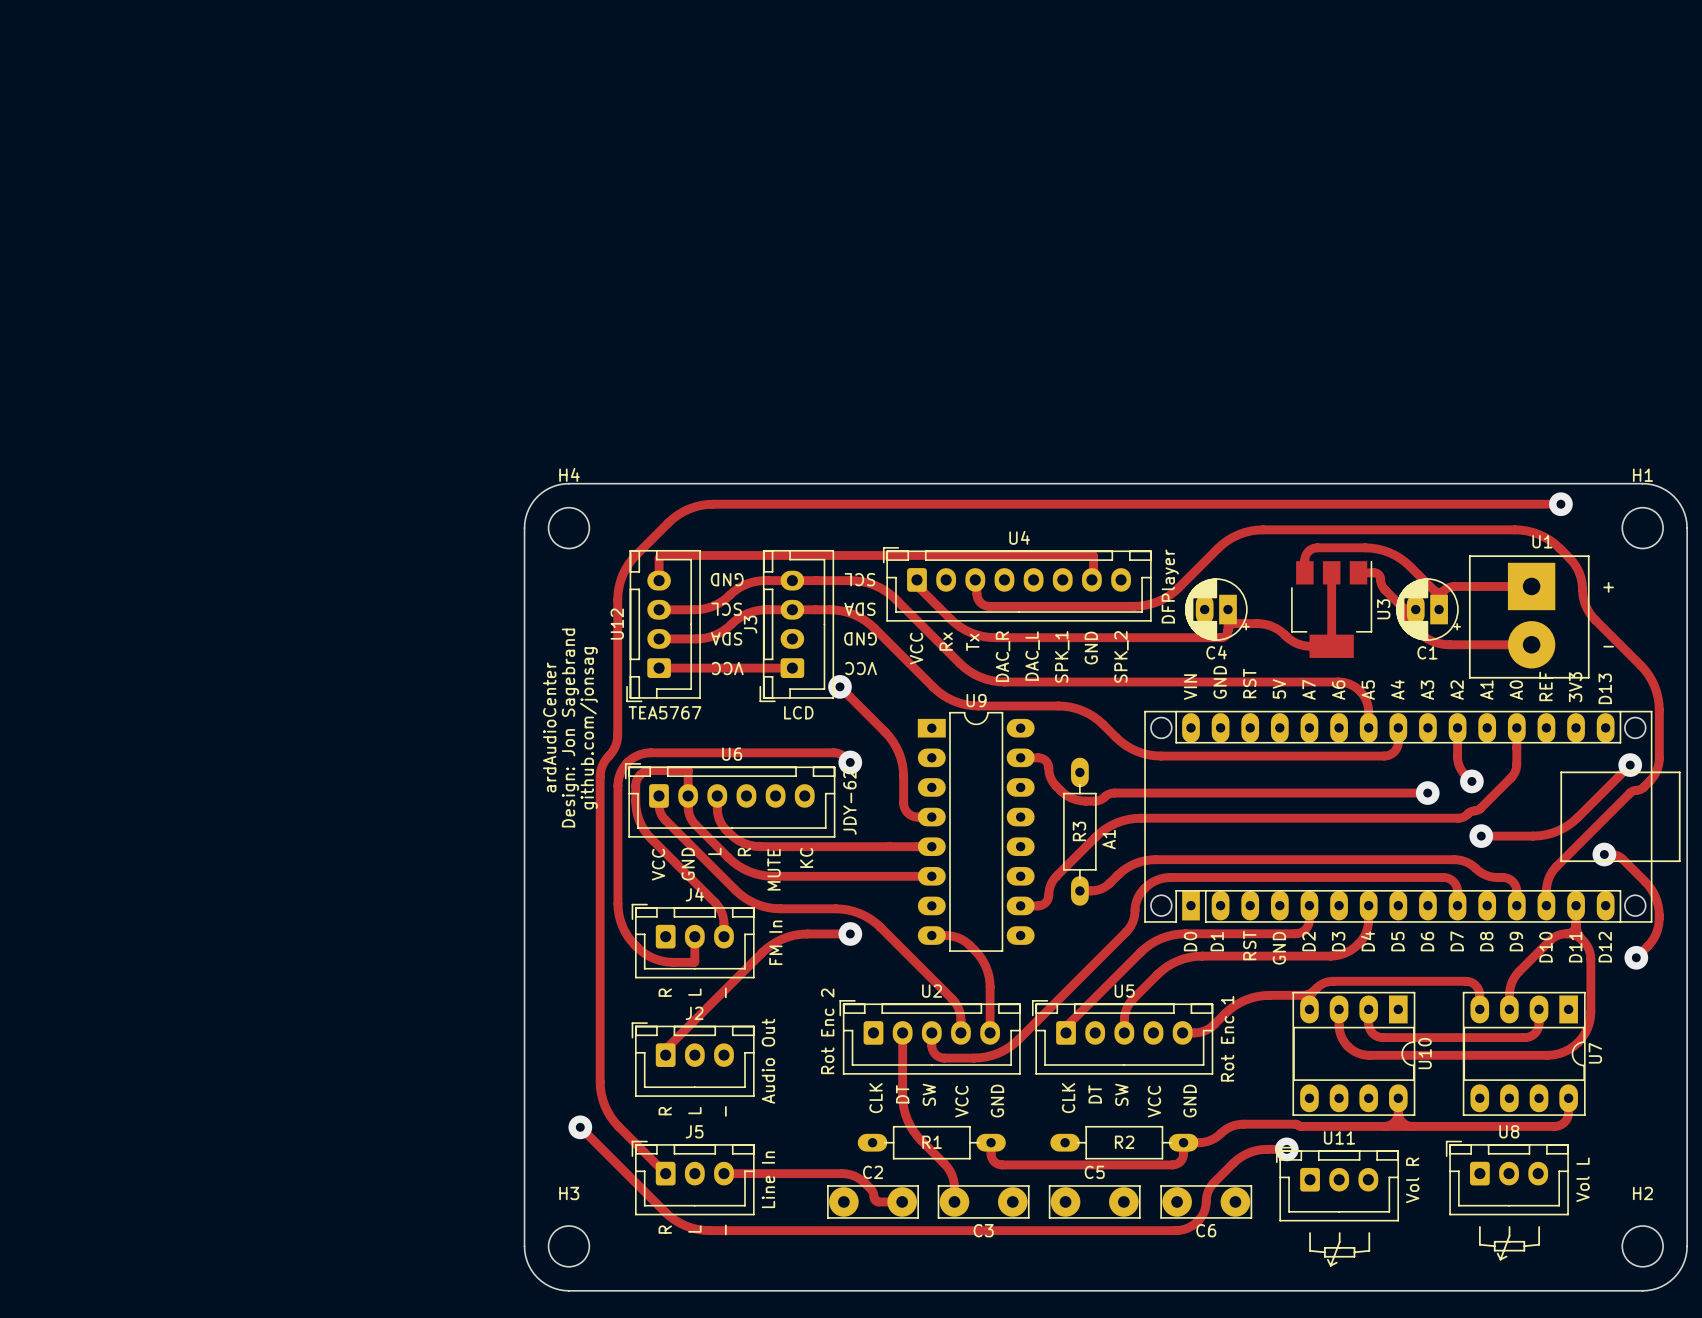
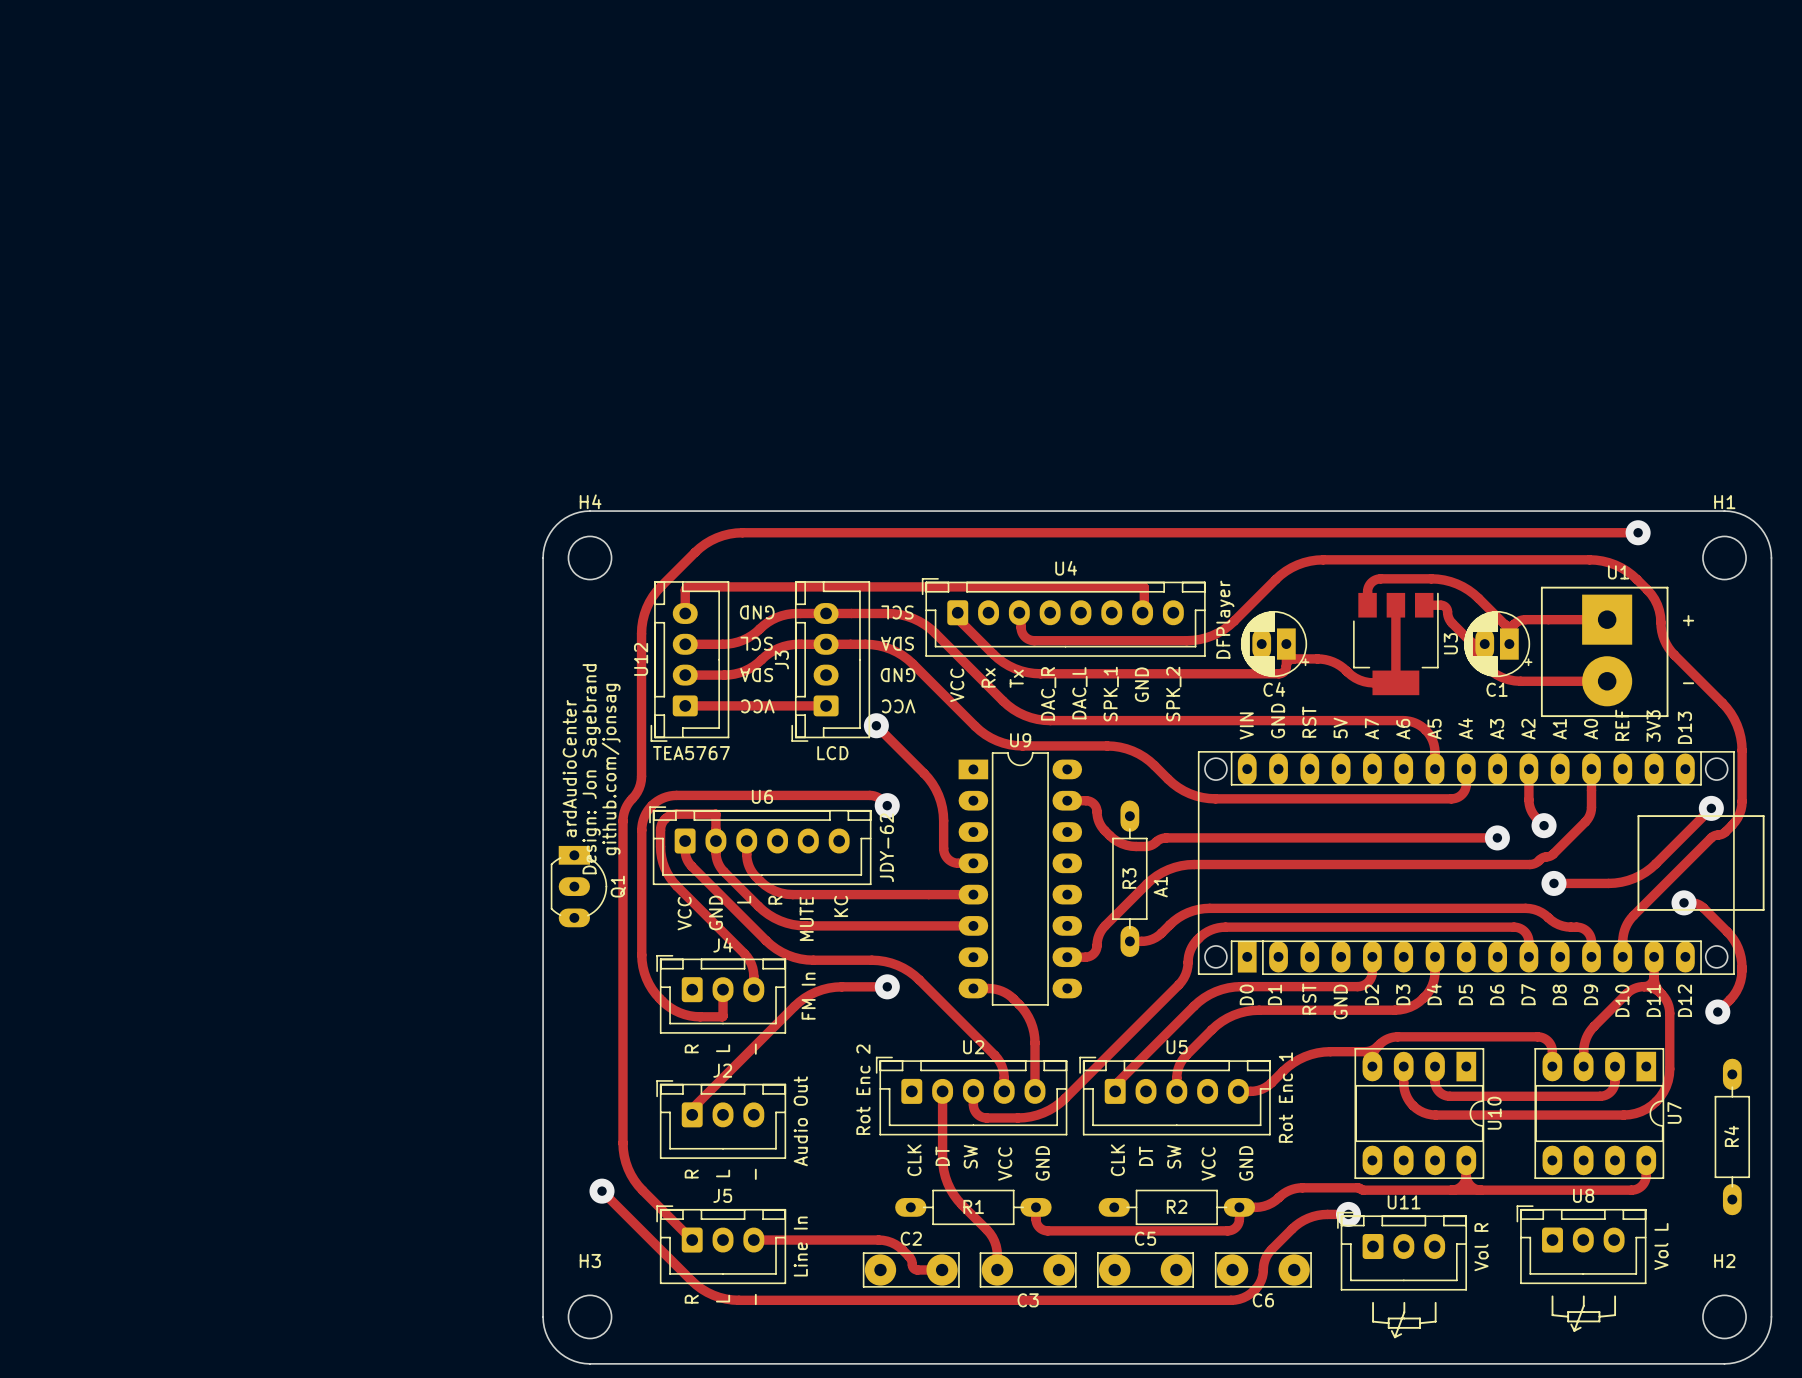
Q1: none -> (578, 886)
R4: none -> (1732, 1136)

